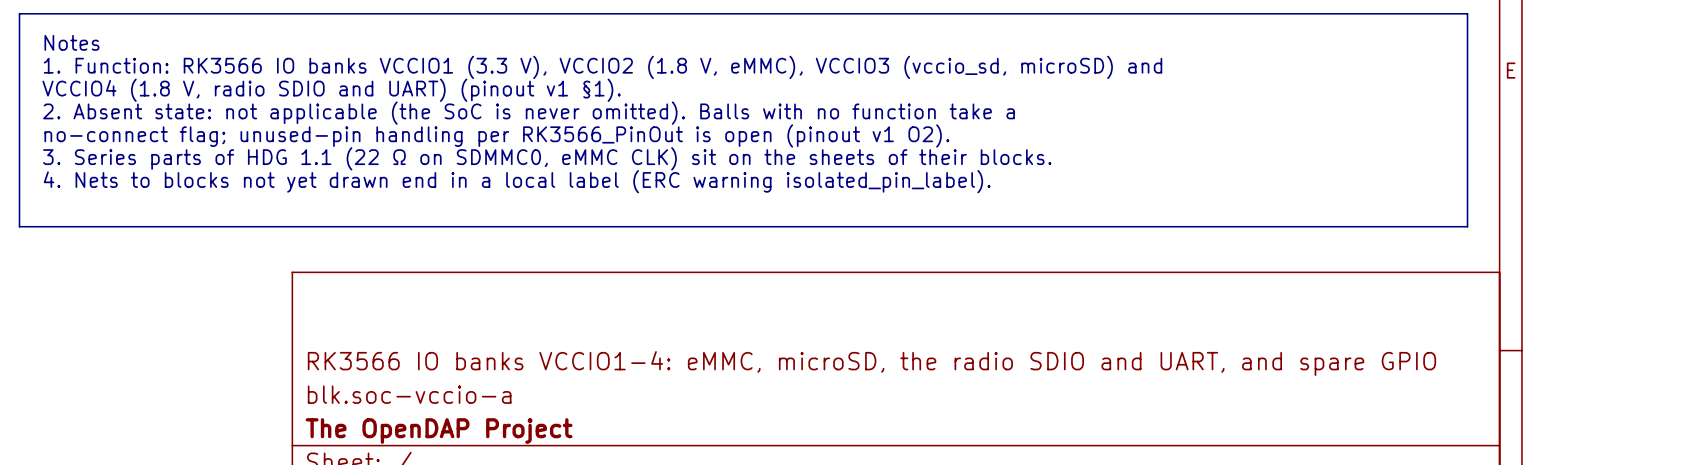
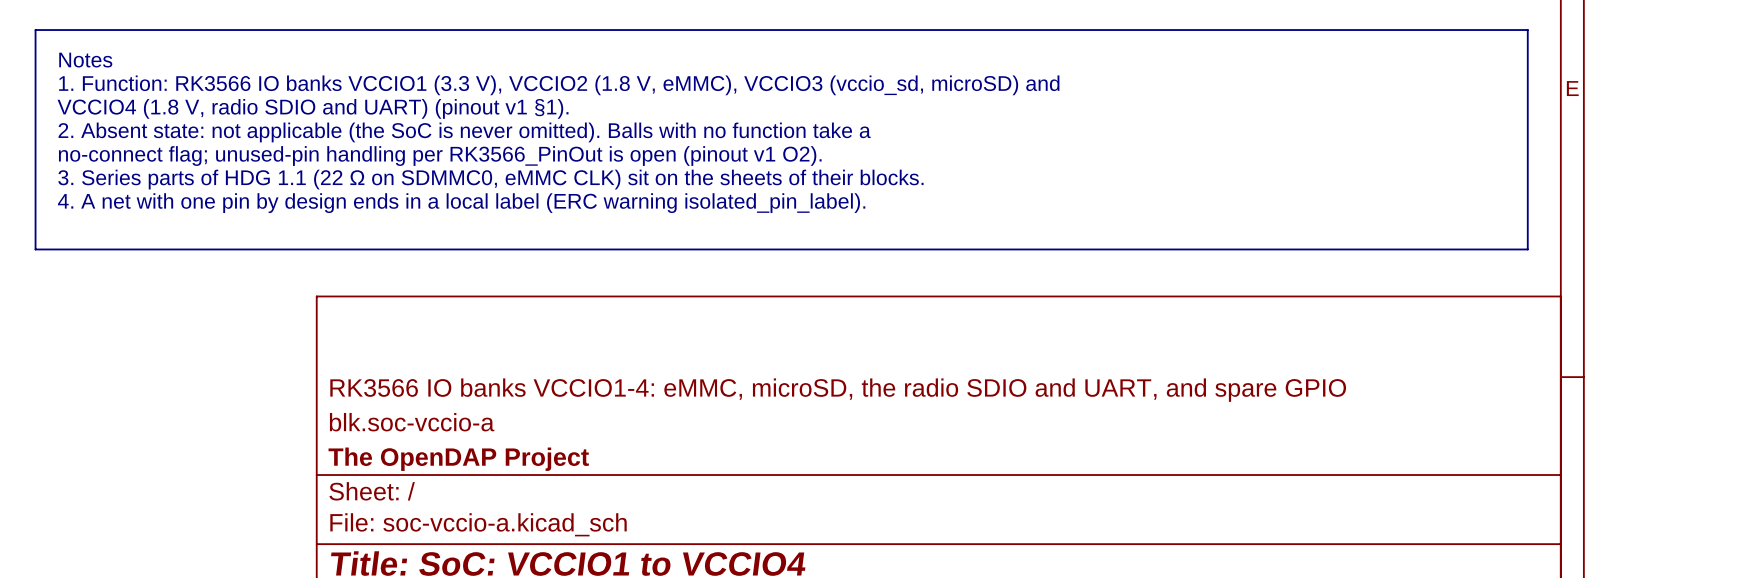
text: 4. Nets to blocks not yet drawn end in a local label (ERC warning isolated_pin_label). (517, 181) -> 4. A net with one pin by design ends in a local label (ERC warning isolated_pin_label). (461, 203)

